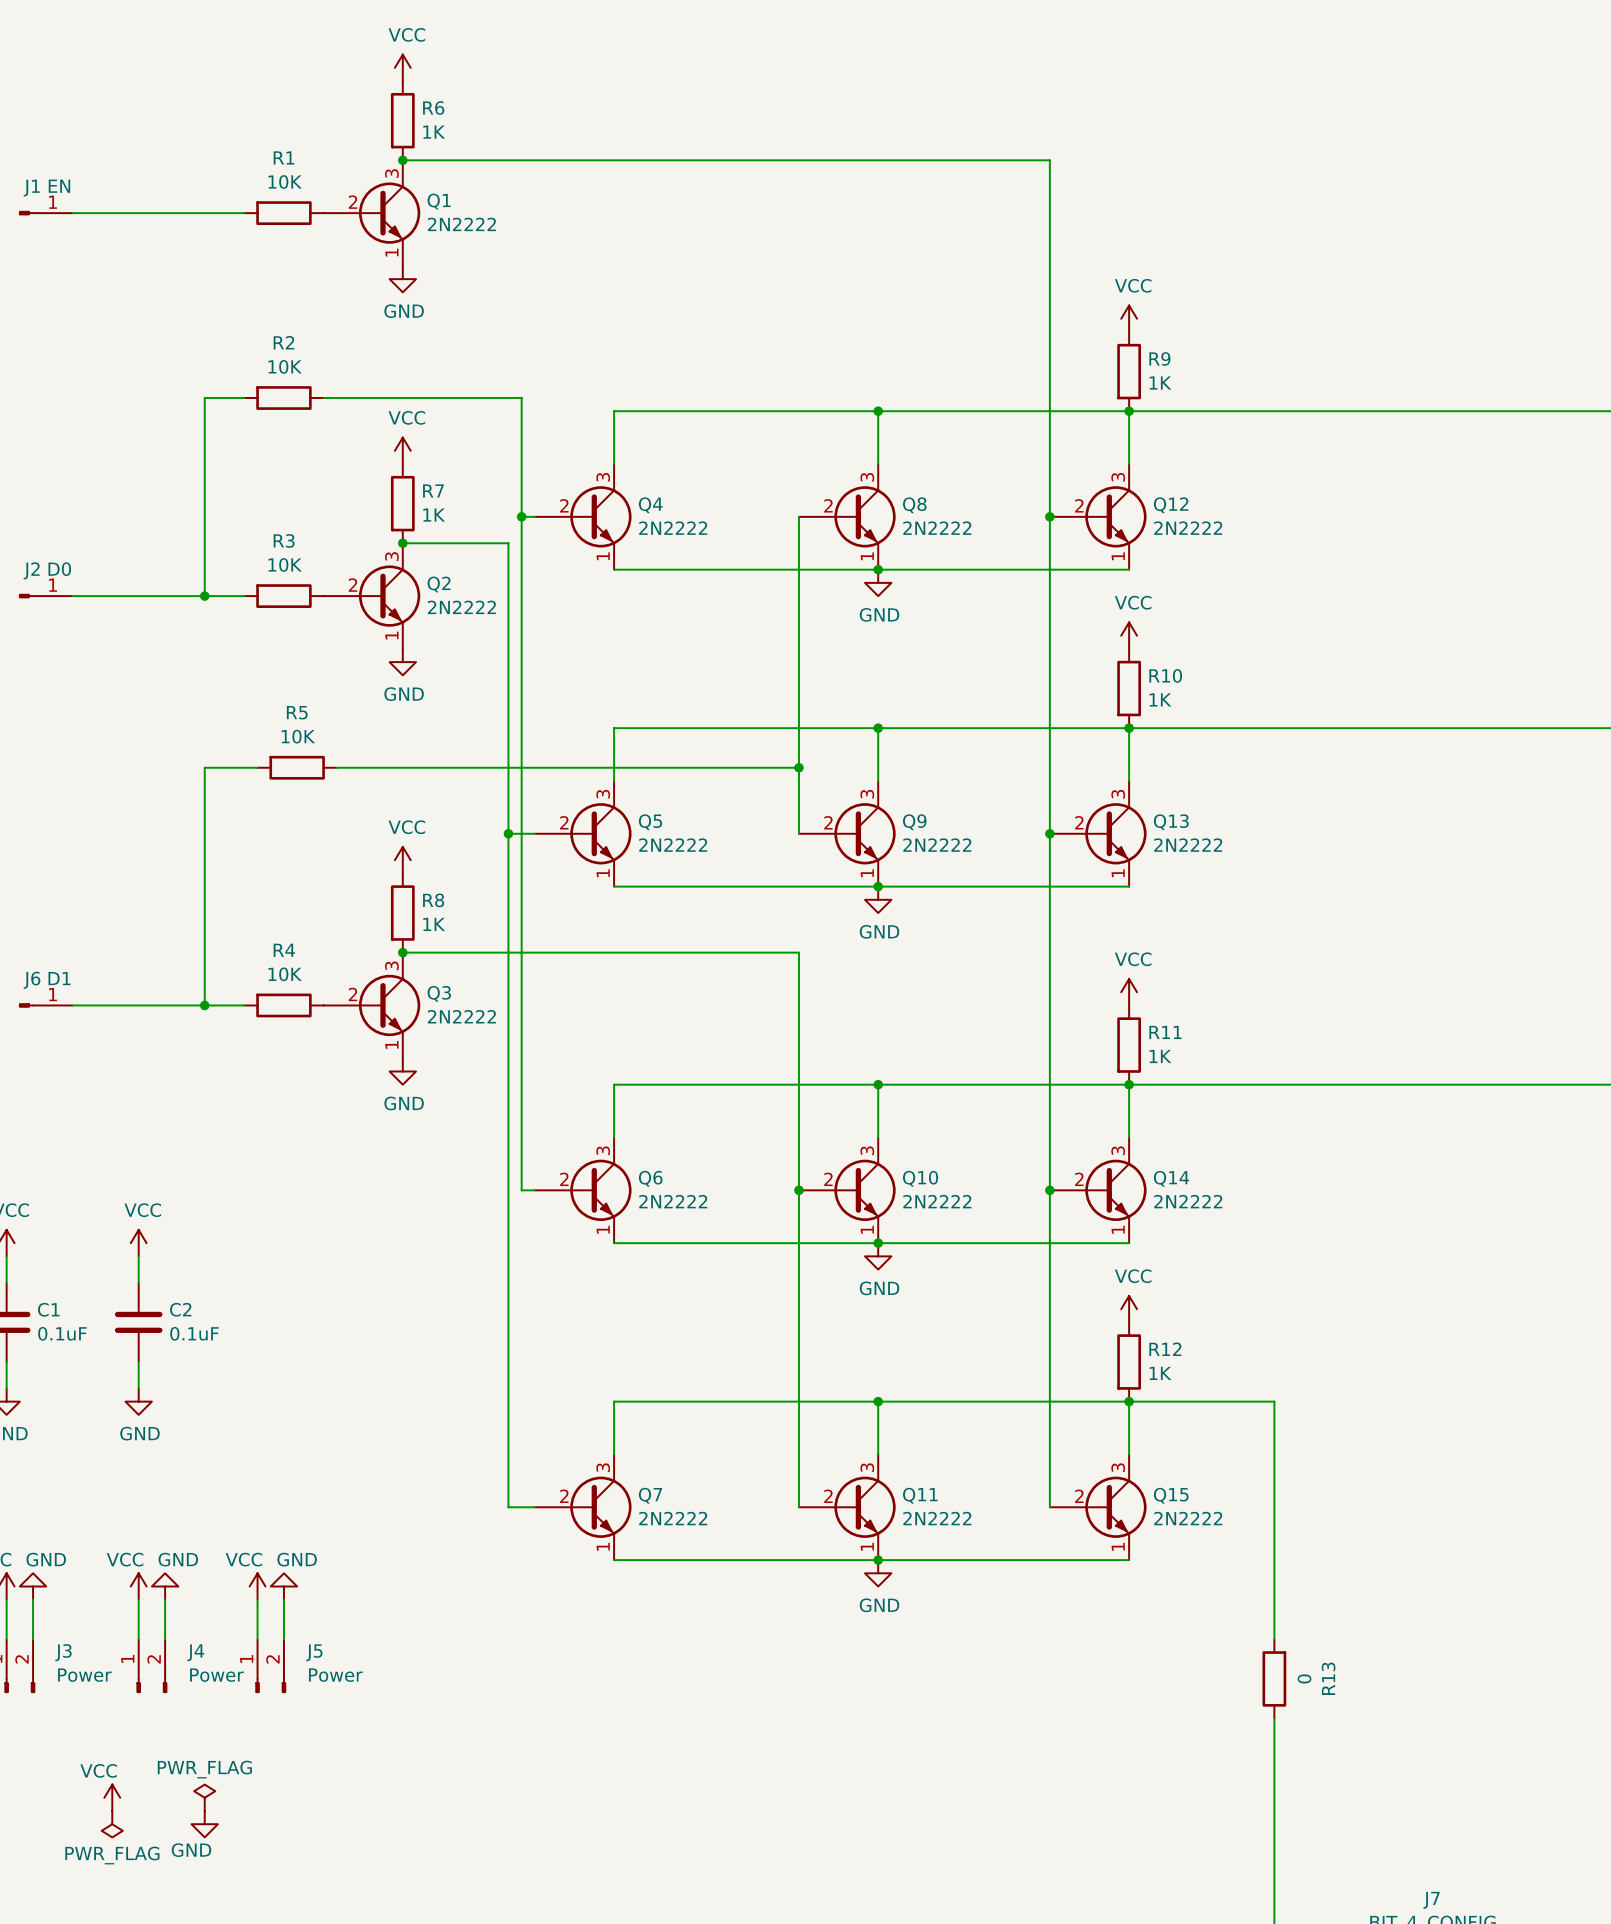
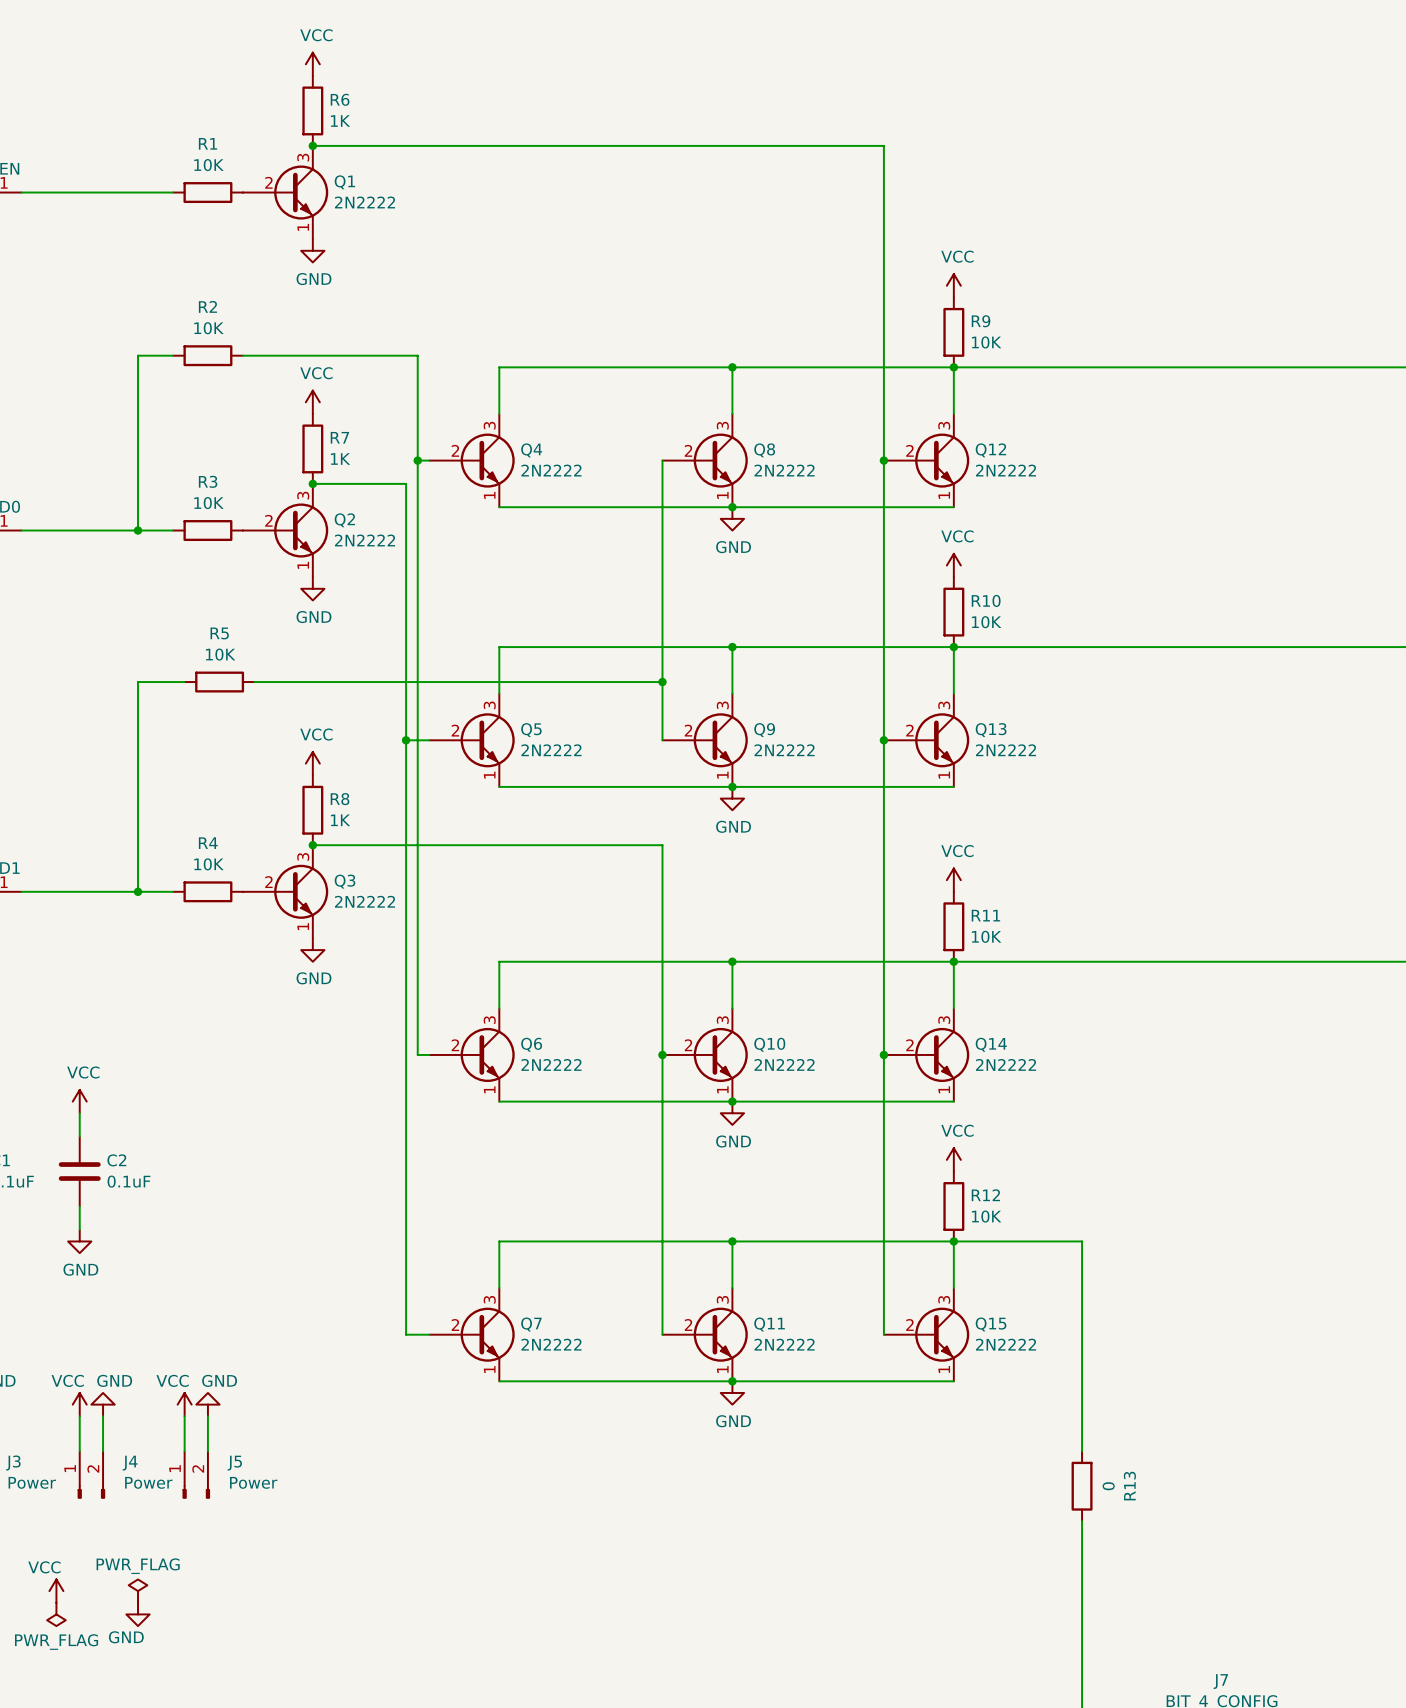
R9 value: 1K (1160, 382) -> 10K (986, 342)
R10 value: 1K (1160, 699) -> 10K (986, 622)
R11 value: 1K (1160, 1056) -> 10K (986, 936)
R12 value: 1K (1160, 1373) -> 10K (986, 1216)

